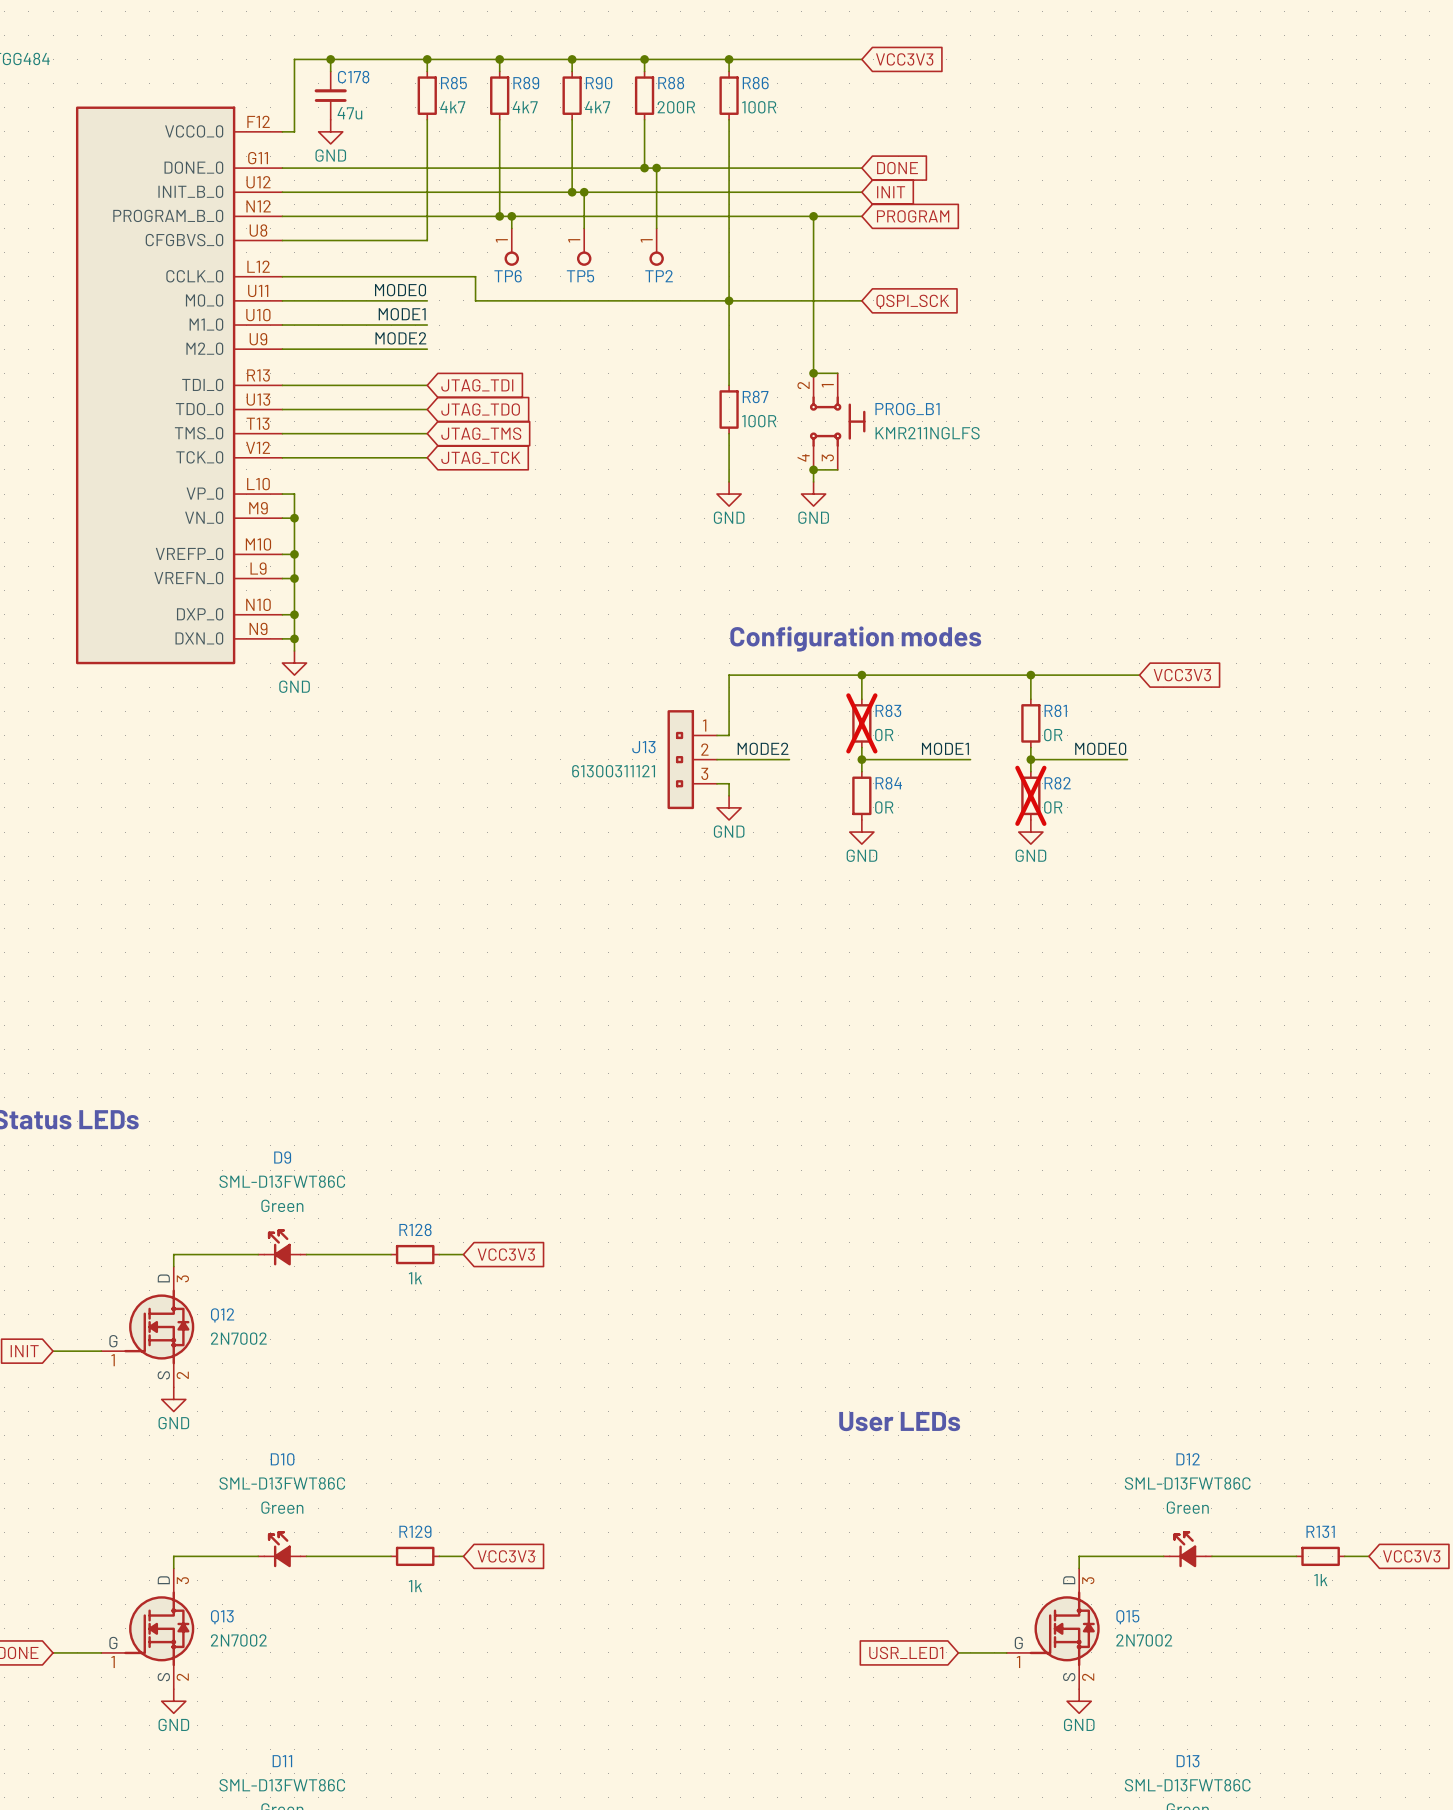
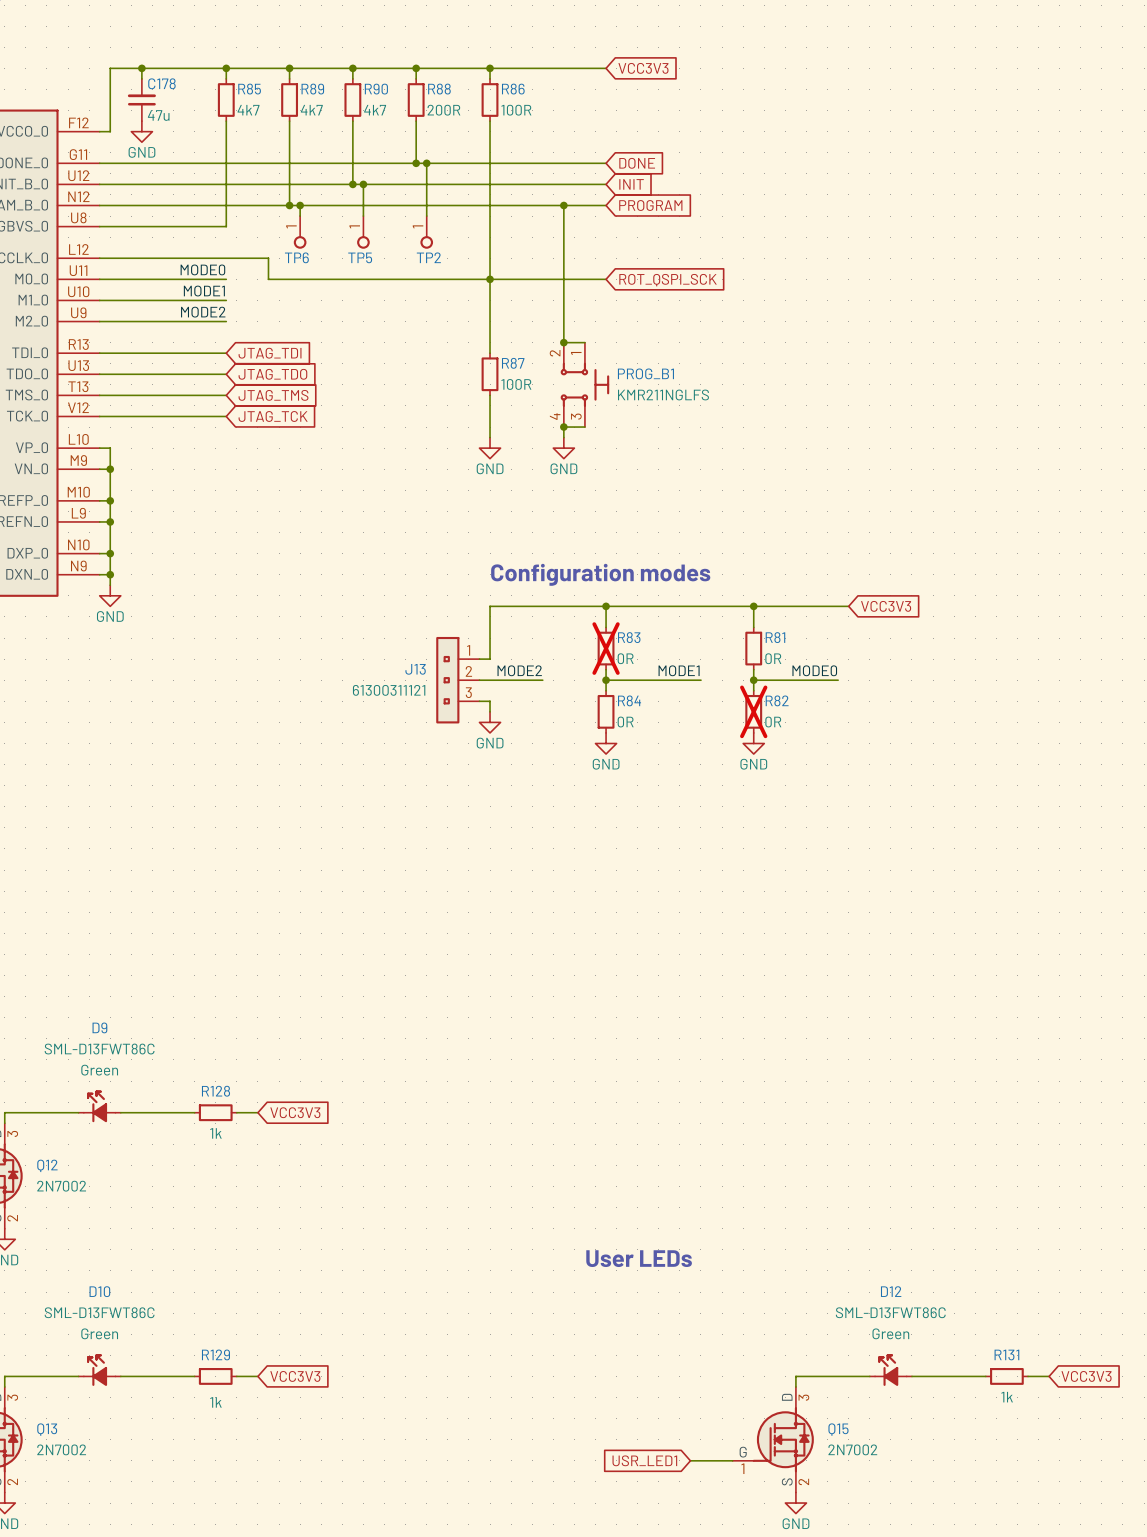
global label: QSPI_SCK (912, 301) -> ROT_QSPI_SCK (668, 280)

